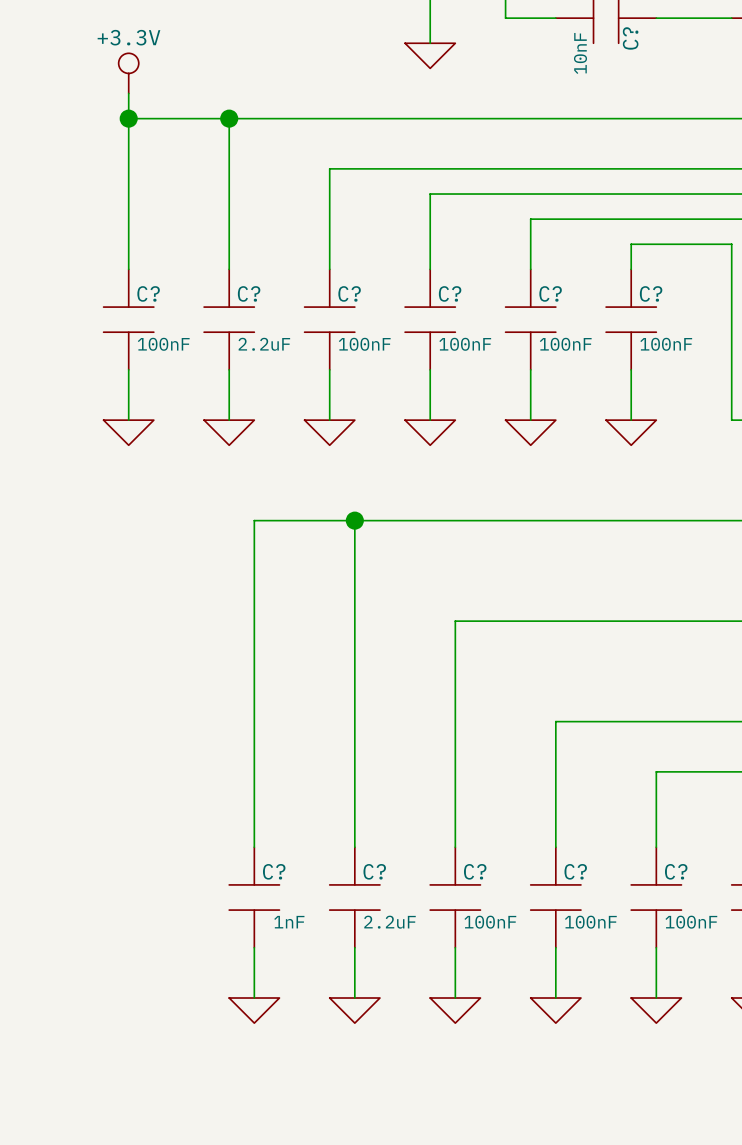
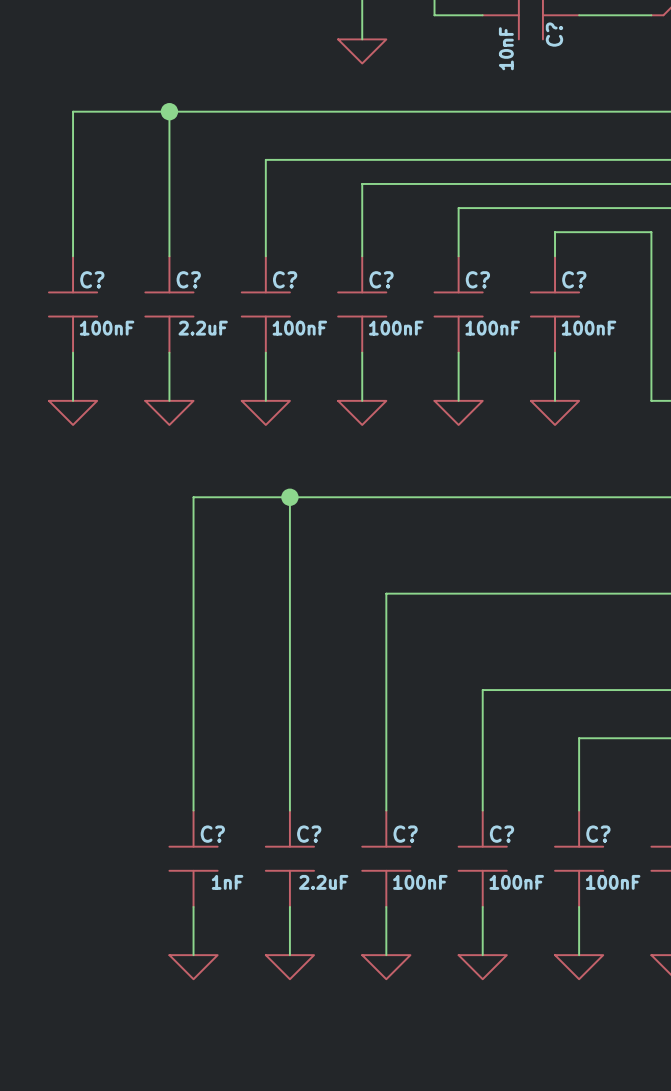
power symbol: +3.3V (128, 73) -> none
wire: (128, 93) (128, 118) -> none
junction: (128, 118) -> none

